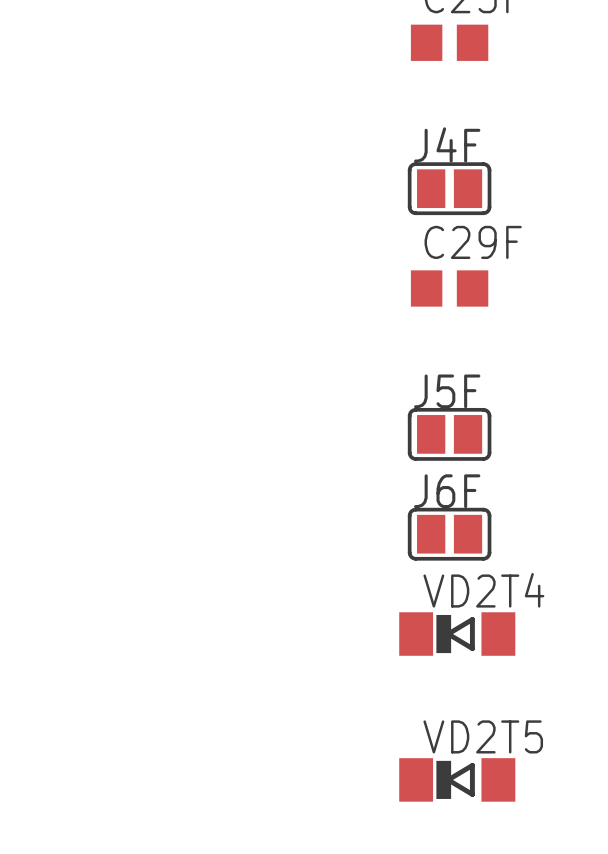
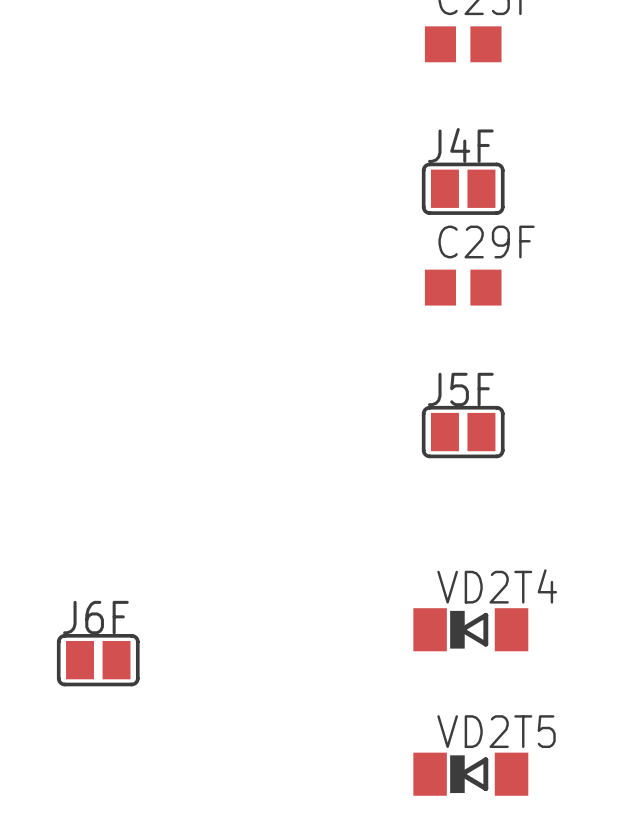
J6F position: (449, 534) -> (98, 660)

